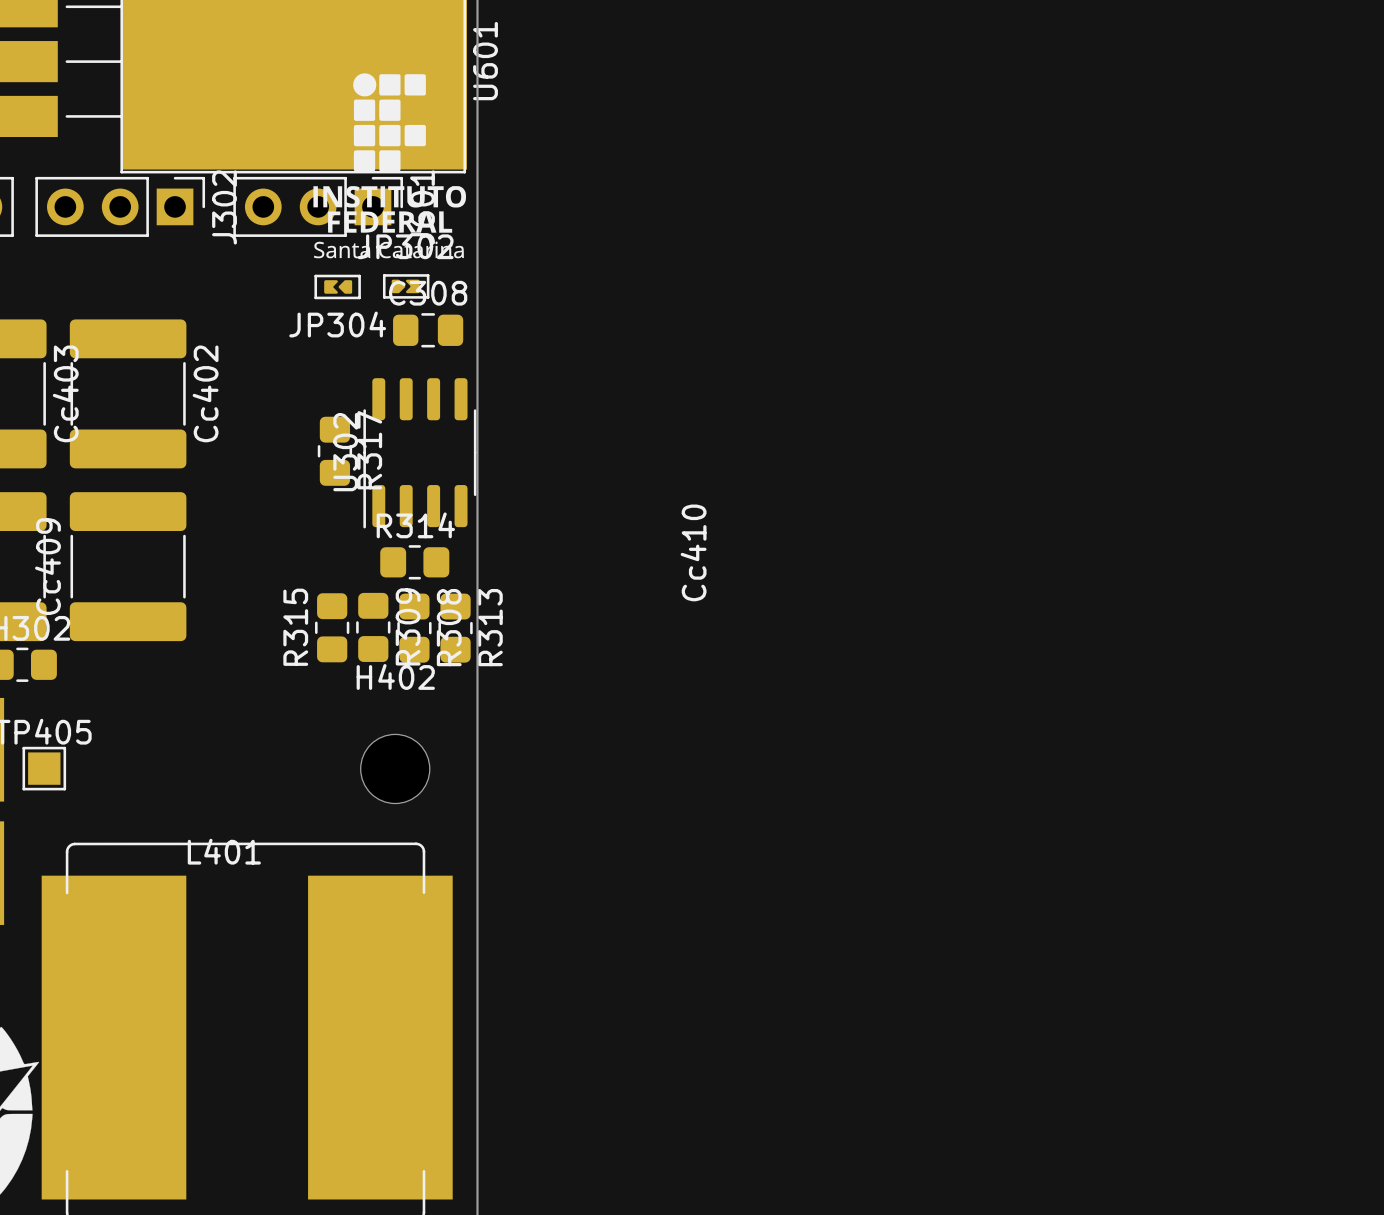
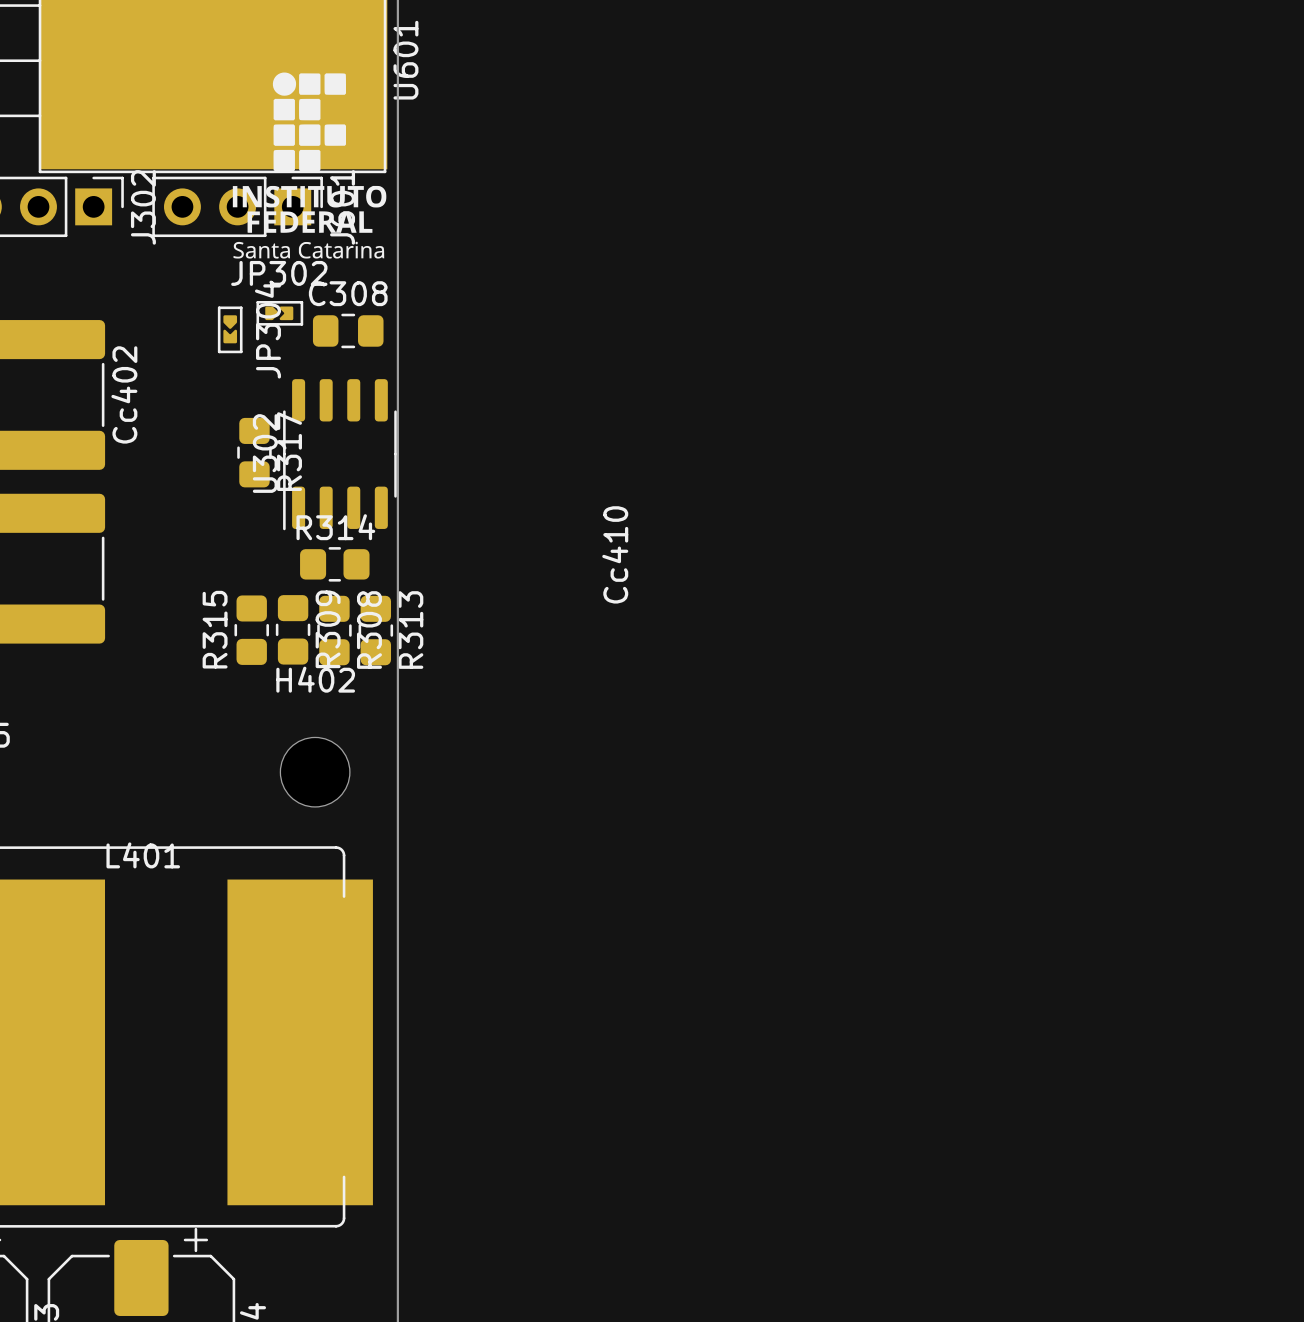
JP304 rotation: 0° (337, 286) -> 90° counterclockwise (230, 329)
JP304 position: (337, 286) -> (230, 329)
JP302 position: (406, 286) -> (279, 313)

